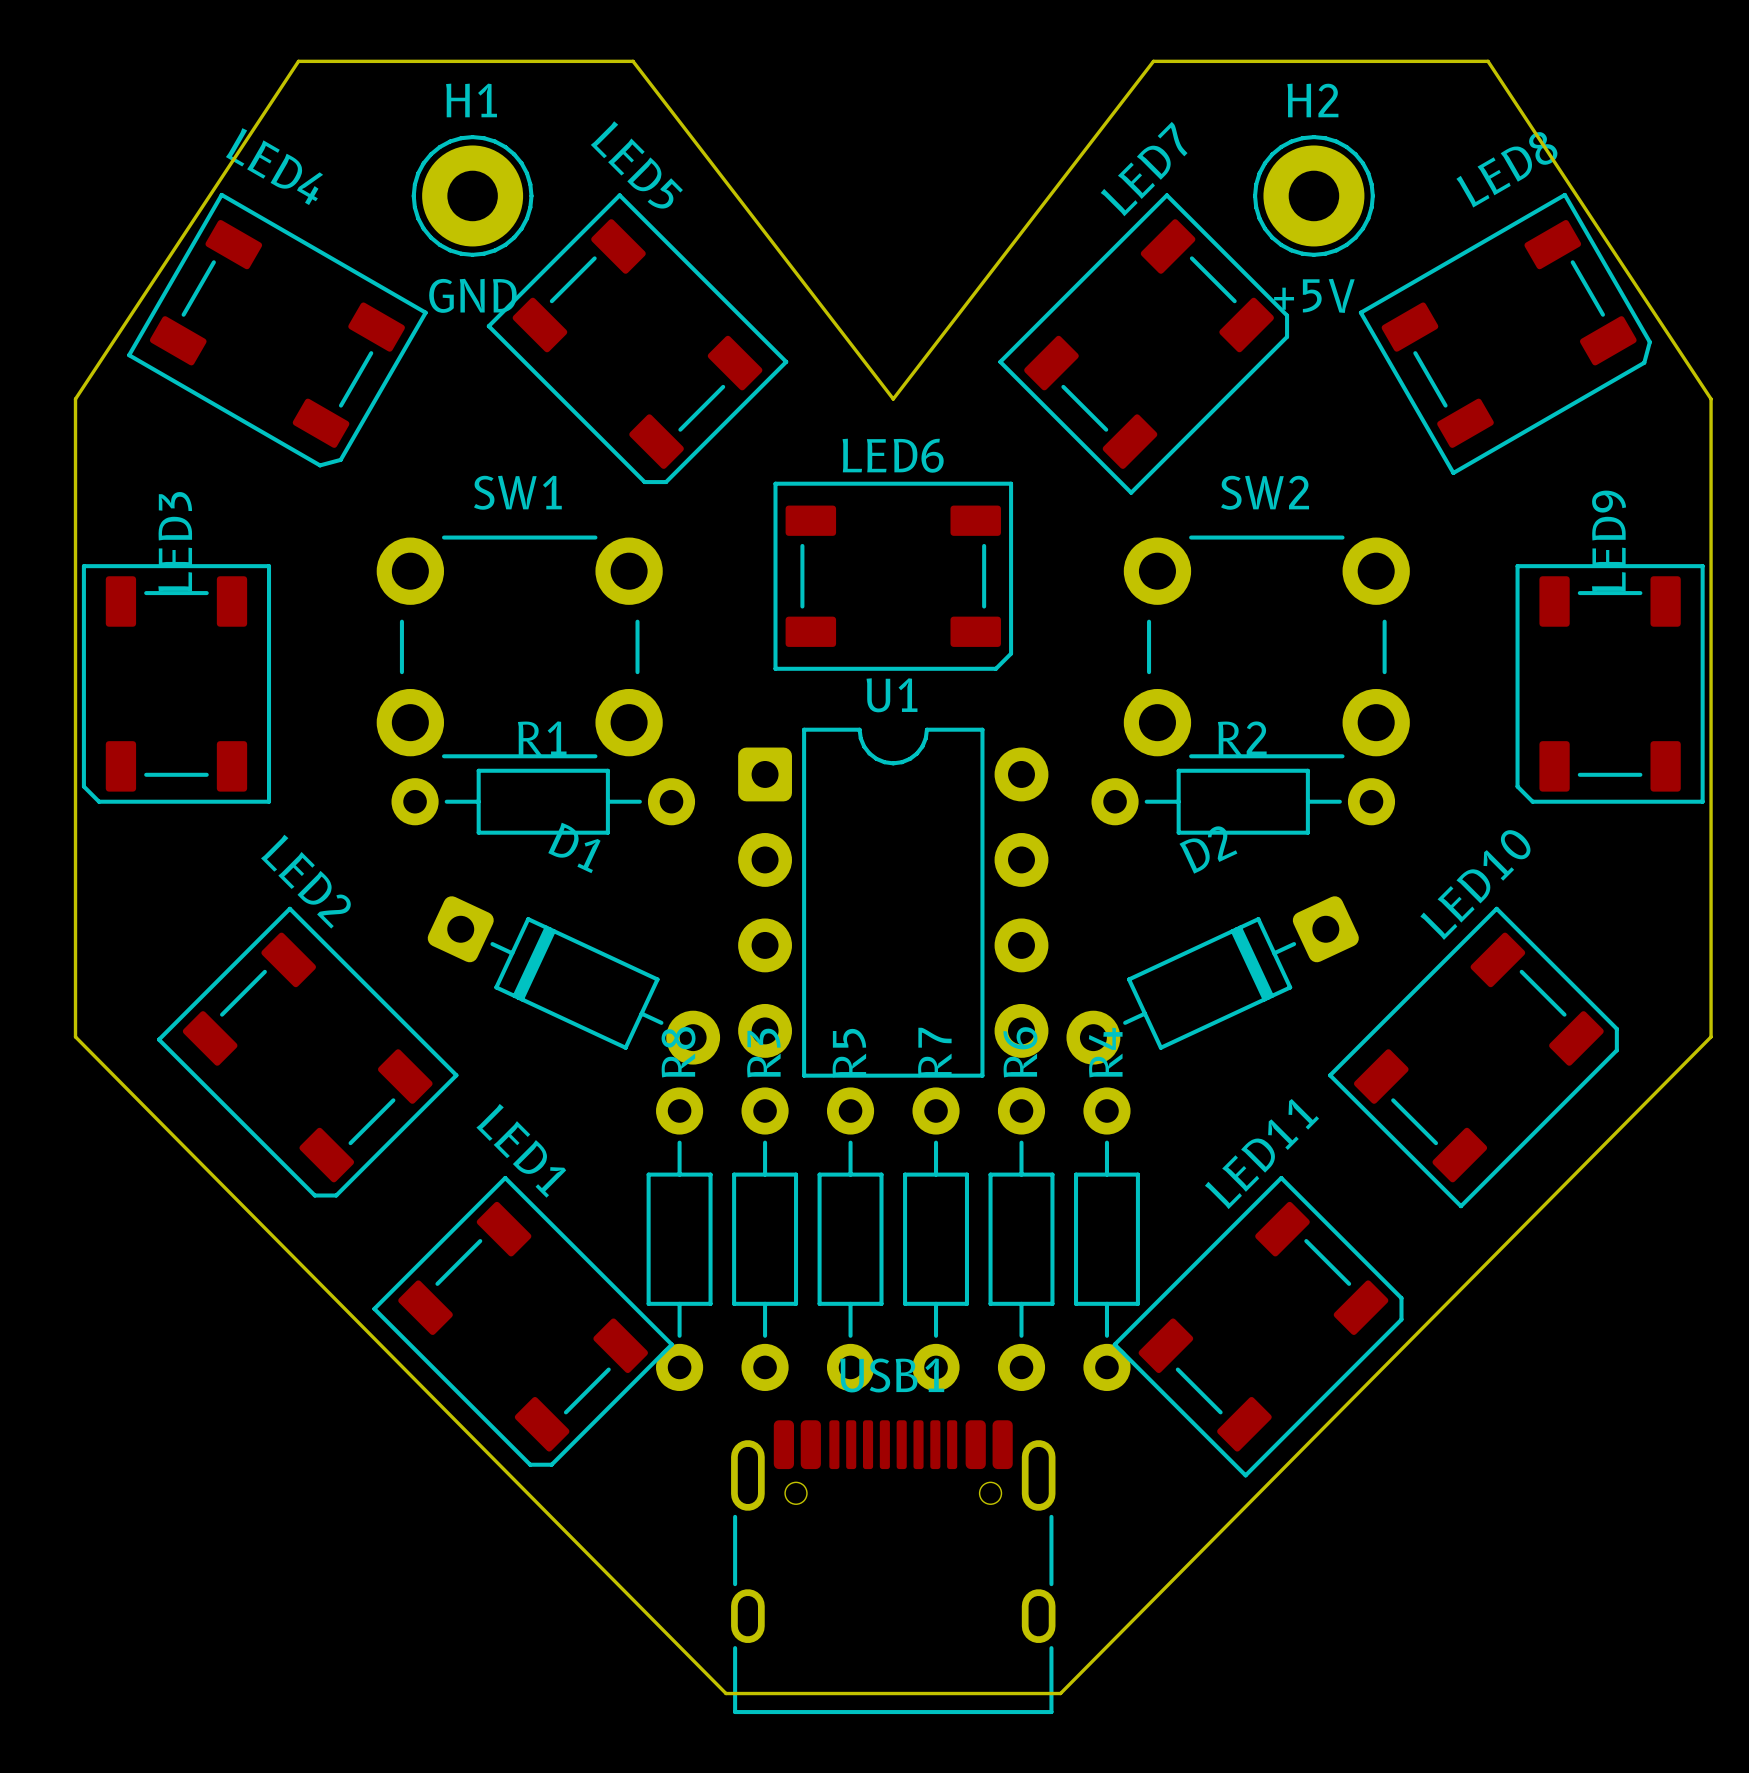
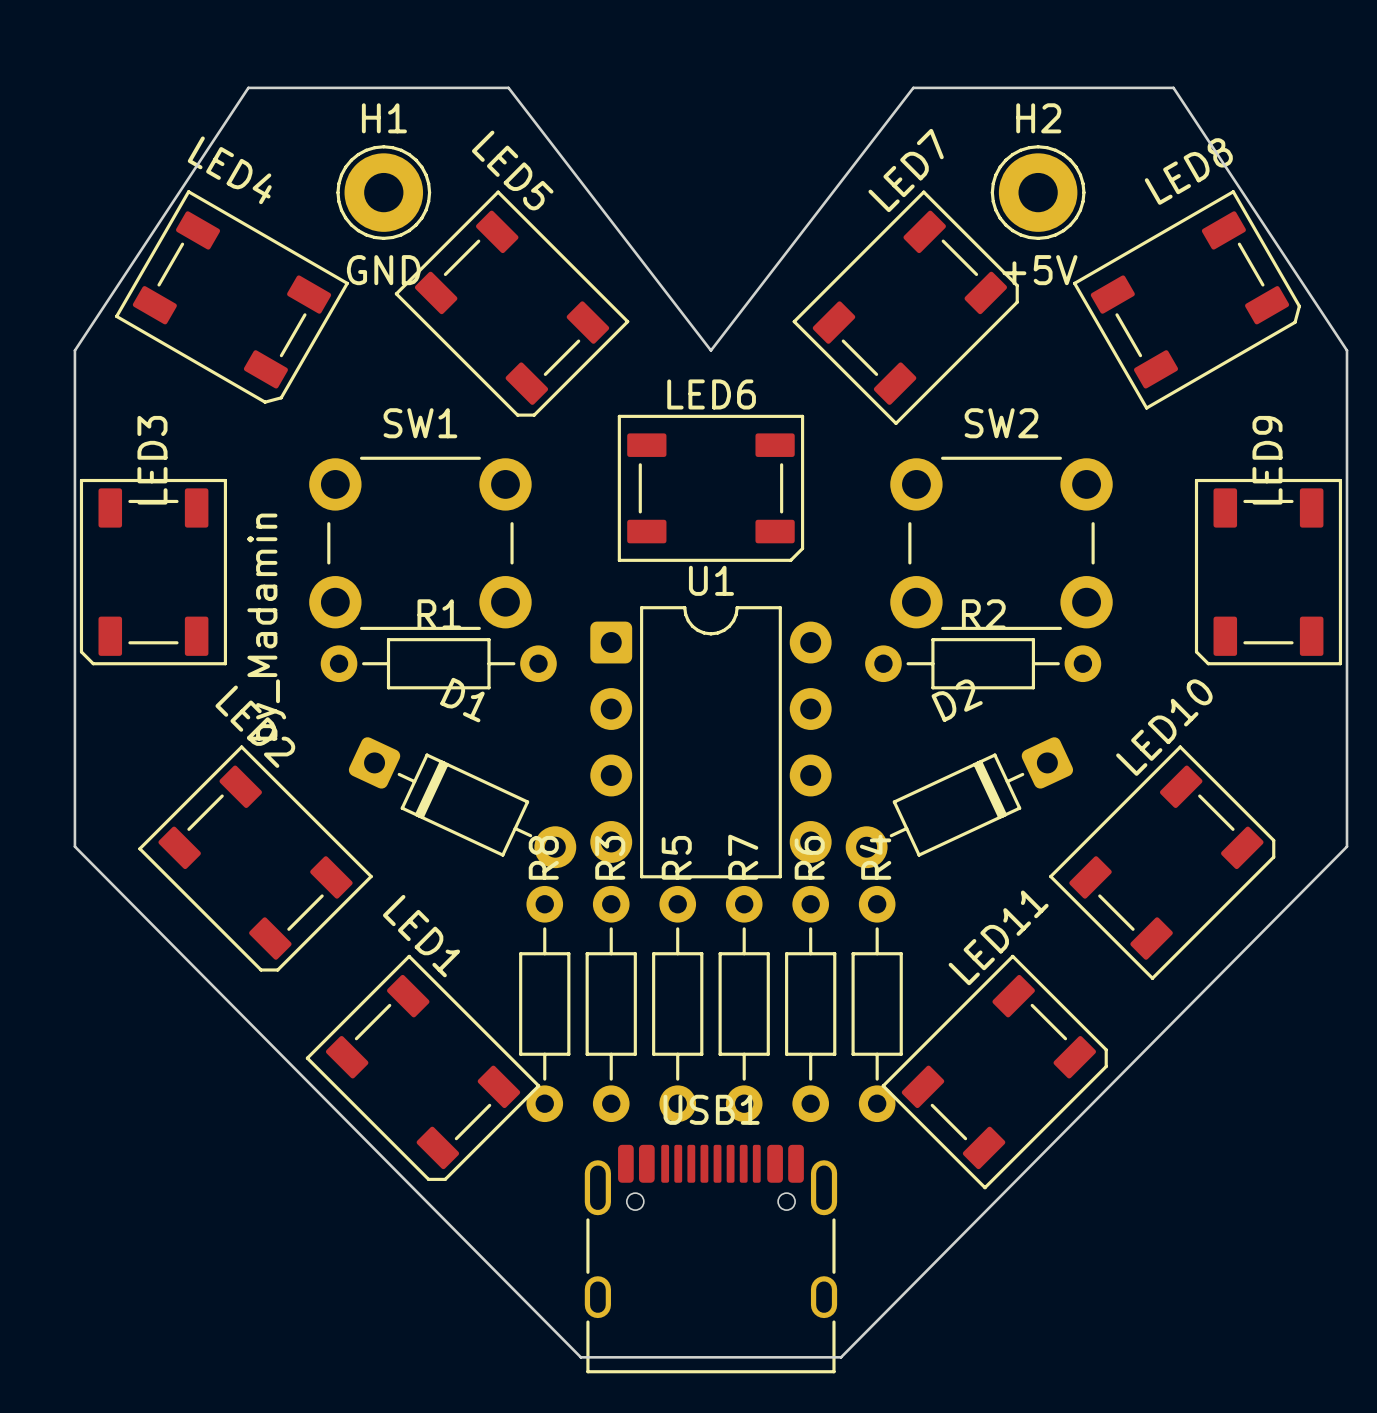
text: none -> by_Madamin (266, 627)

